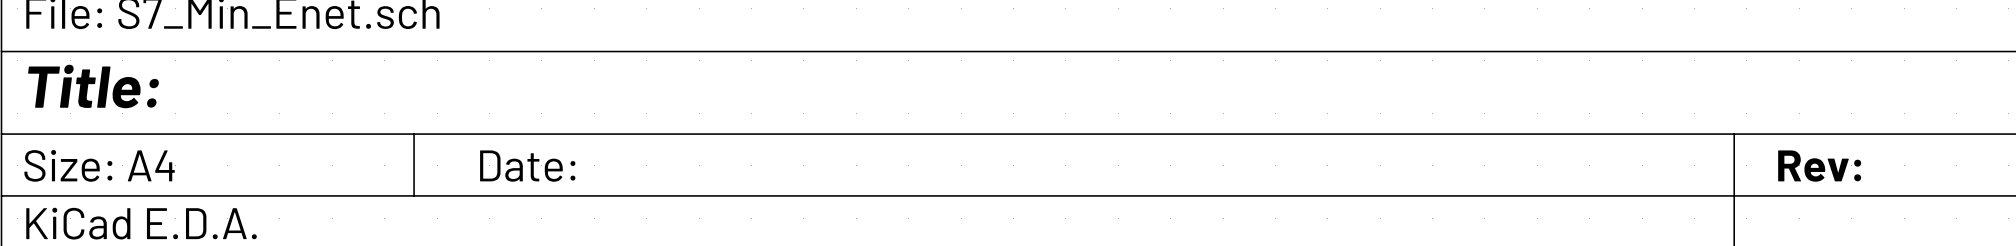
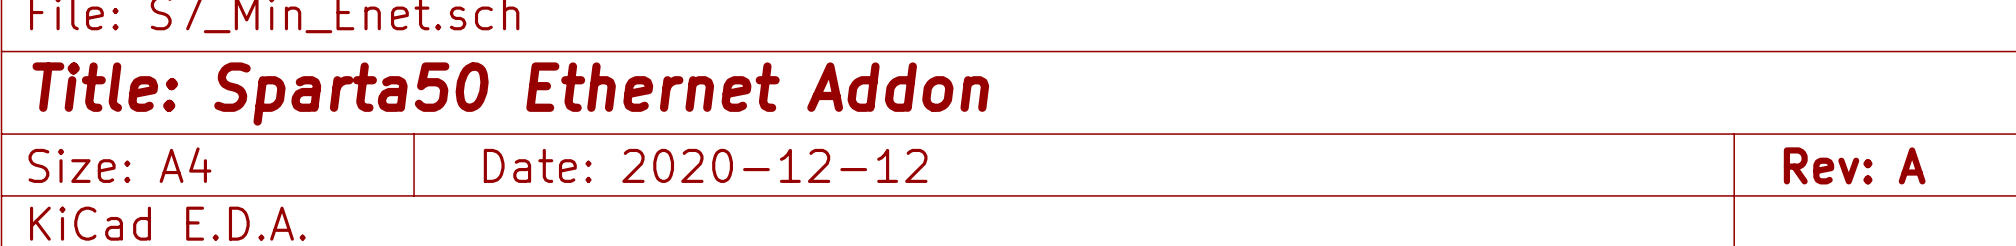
title block: Title: (93, 86) -> Title: Sparta50 Ethernet Addon (510, 94)
title block: Date: (527, 166) -> Date: 2020-12-12 (705, 165)
title block: Rev: (1819, 166) -> Rev: A (1854, 165)

